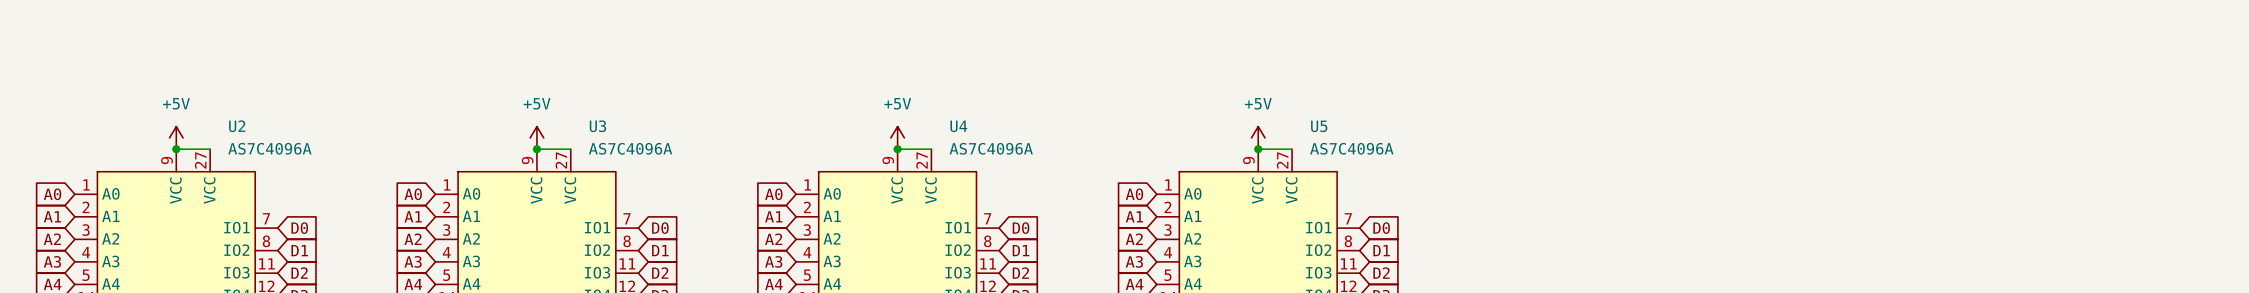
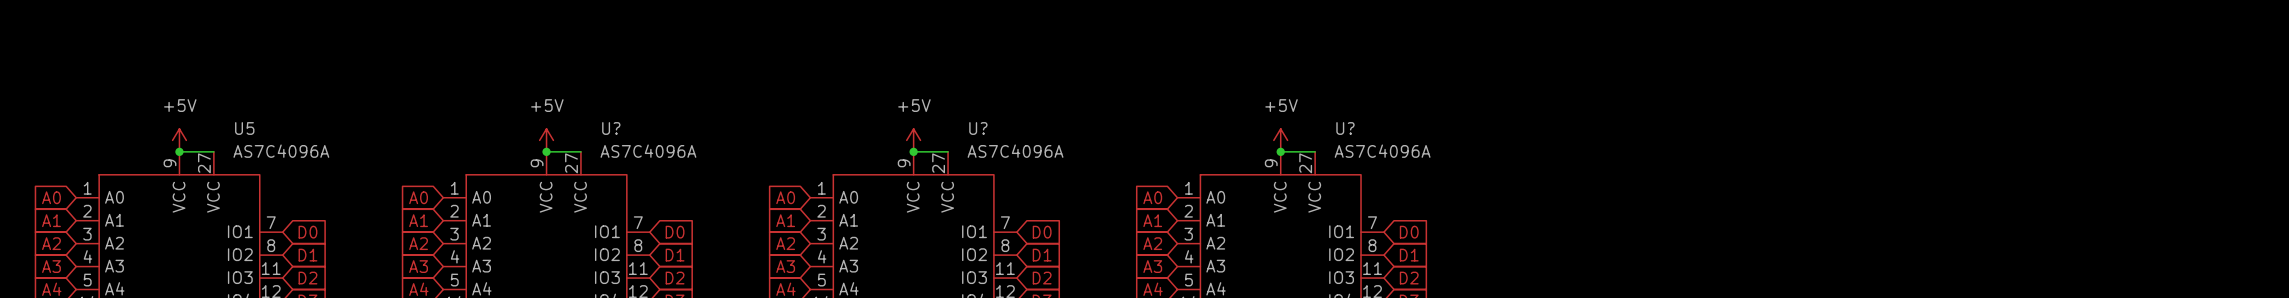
U2 name: U2 (237, 126) -> U5 (244, 128)
U3 name: U3 (597, 126) -> U? (611, 128)
U4 name: U4 (958, 126) -> U? (978, 128)
U5 name: U5 (1319, 126) -> U? (1345, 128)

